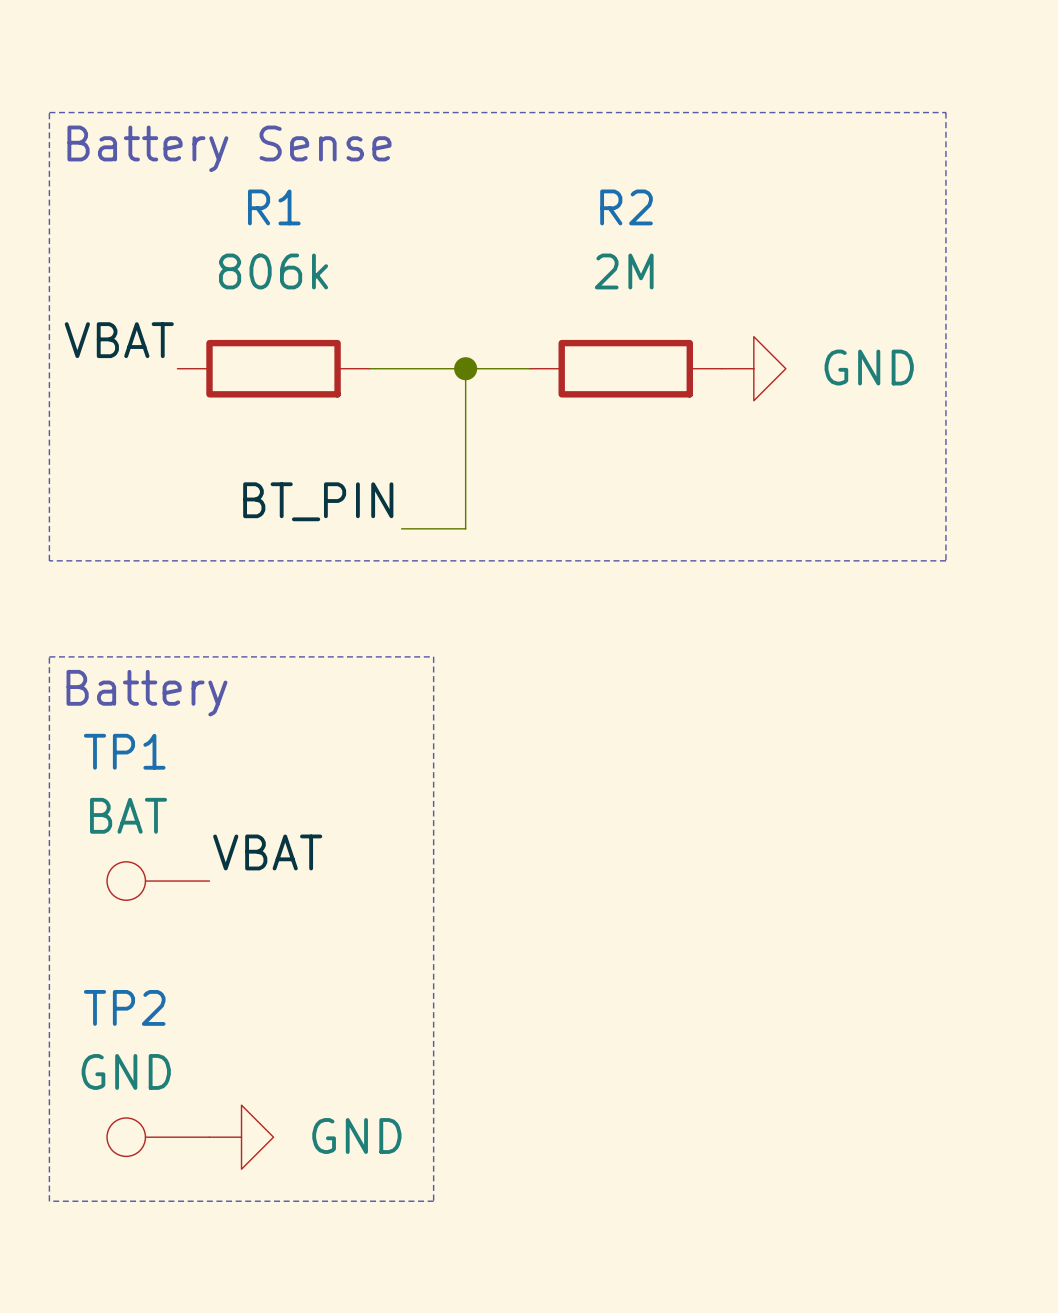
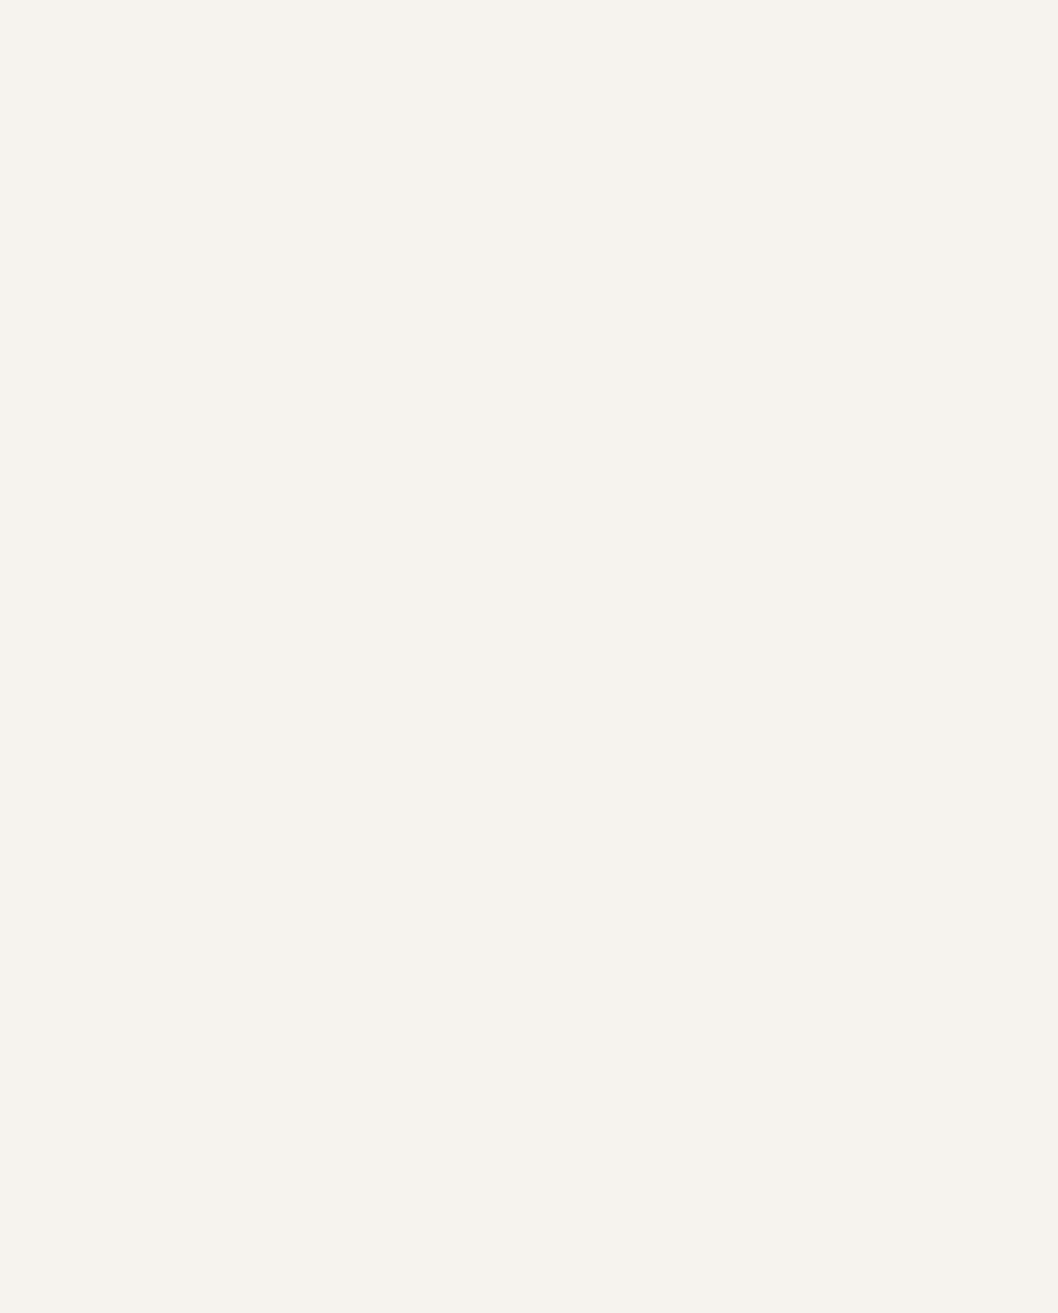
line: (49, 112) (945, 112) (945, 560) (49, 560) (49, 112) -> none
text: Battery Sense (229, 148) -> none
label: VBAT (119, 340) -> none
R1: 806k (273, 368) -> none
wire: (369, 368) (529, 368) -> none
wire: (465, 368) (465, 528) (401, 528) -> none
junction: (465, 368) -> none
R2: 2M (625, 368) -> none
power symbol: GND (753, 368) -> none
label: BT_PIN (318, 501) -> none
line: (49, 656) (49, 1201) (433, 1201) (433, 656) (49, 656) -> none
text: Battery (146, 693) -> none
label: VBAT (267, 852) -> none
TP1: BAT (158, 881) -> none
TP2: GND (158, 1137) -> none
power symbol: GND (241, 1137) -> none

